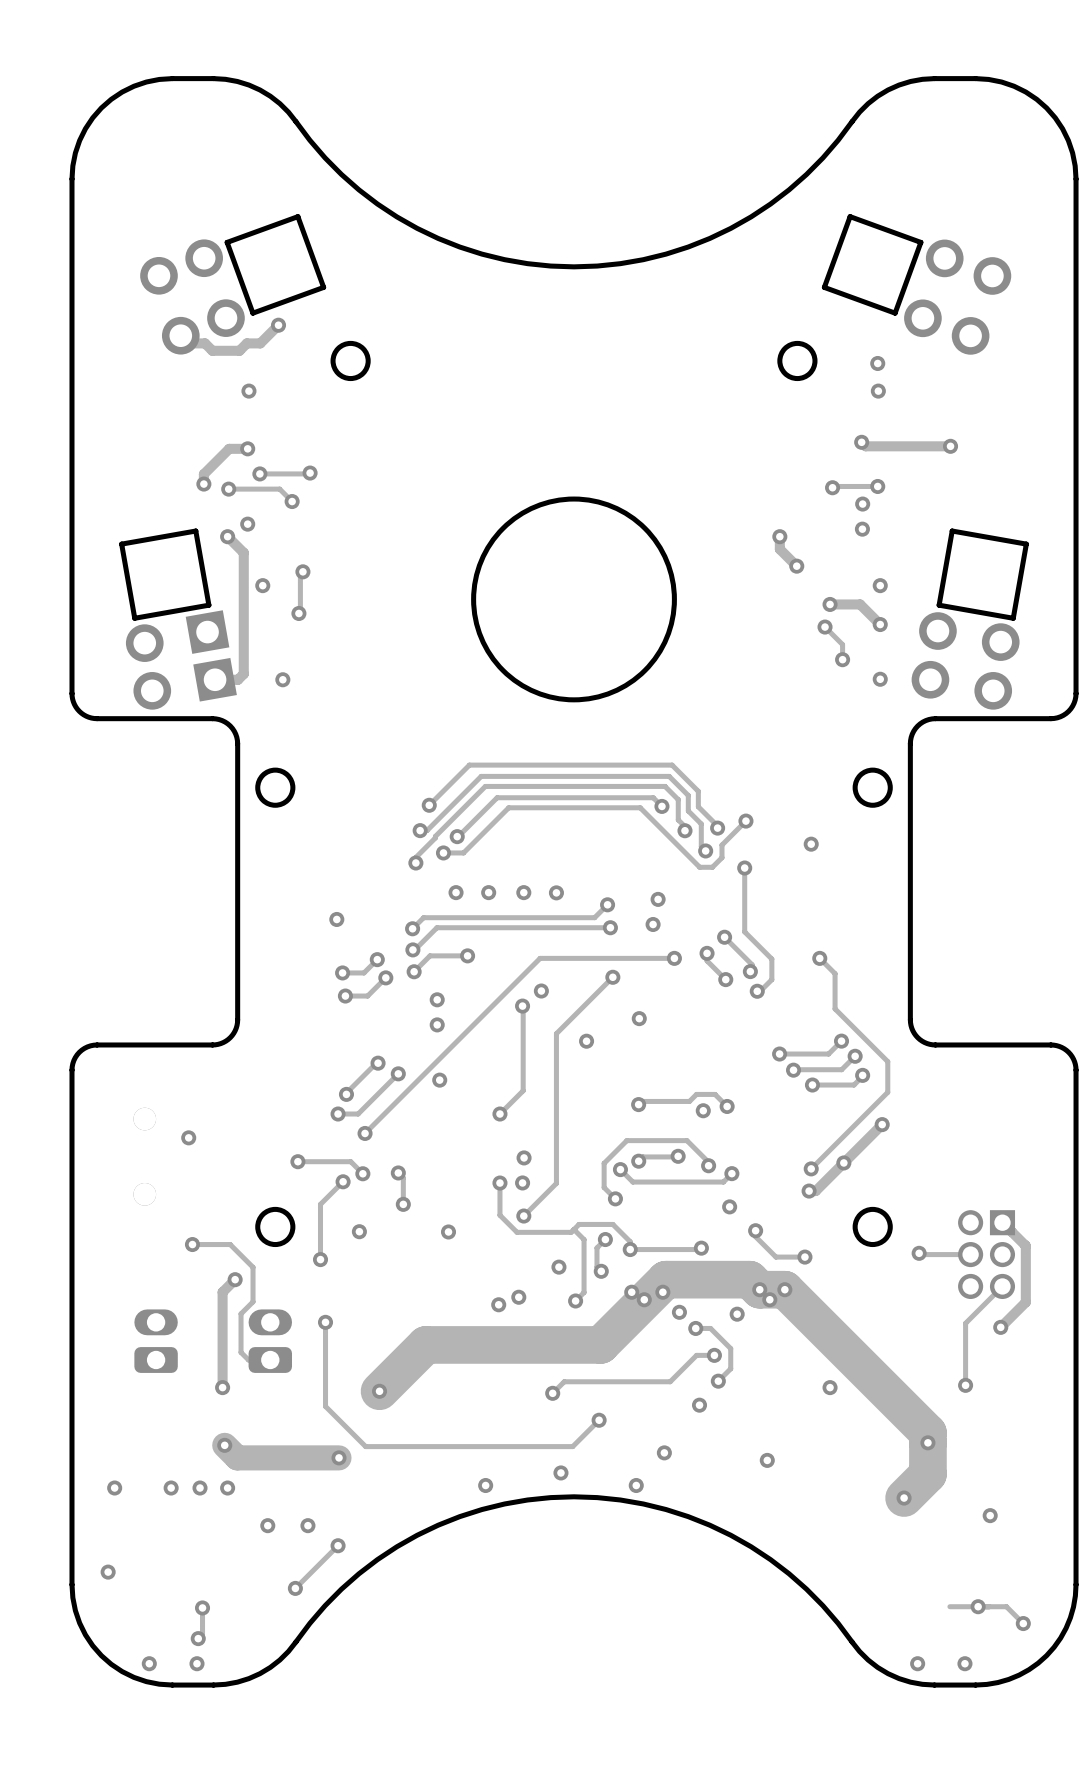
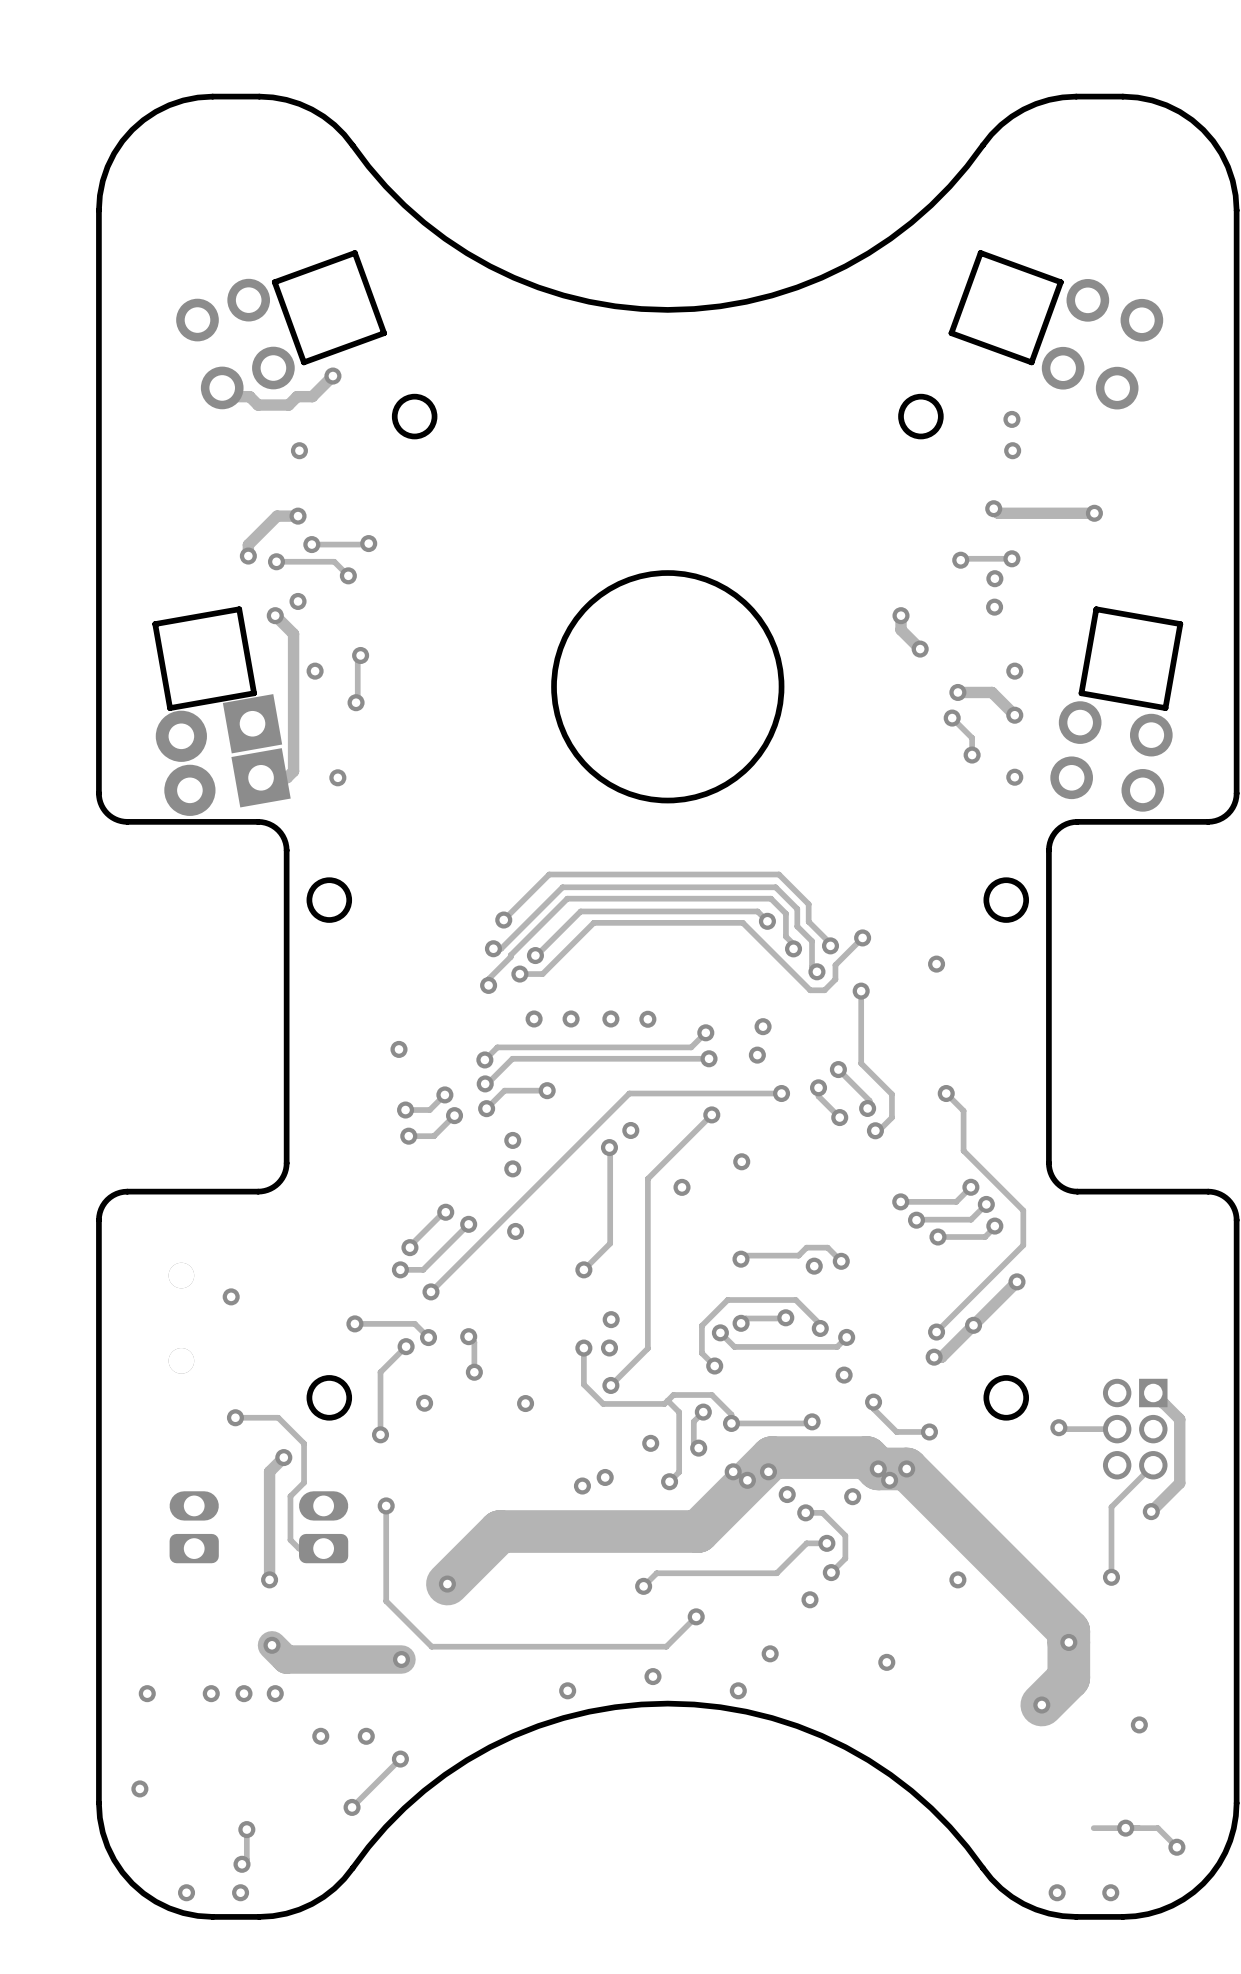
part footprint: [125, 610, 230, 662] -> [155, 694, 283, 762]
part footprint: [133, 657, 237, 710] -> [164, 748, 291, 816]

